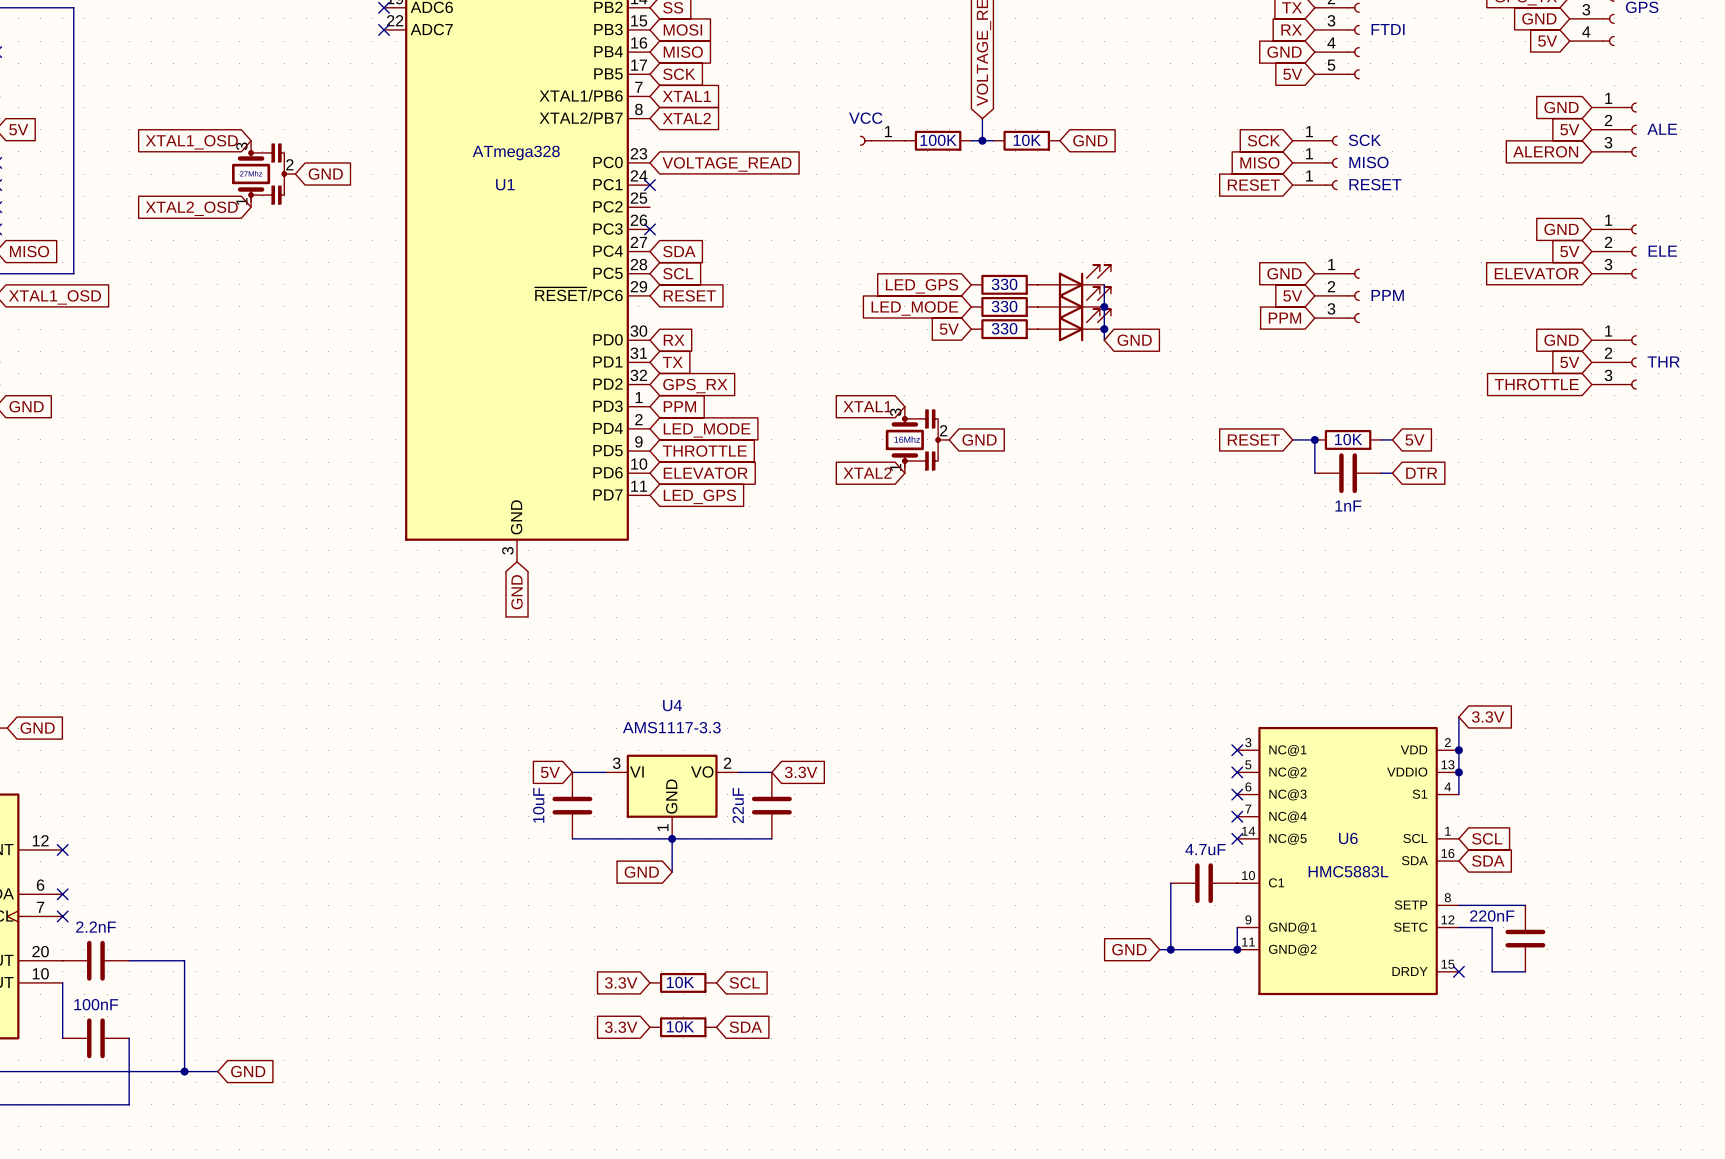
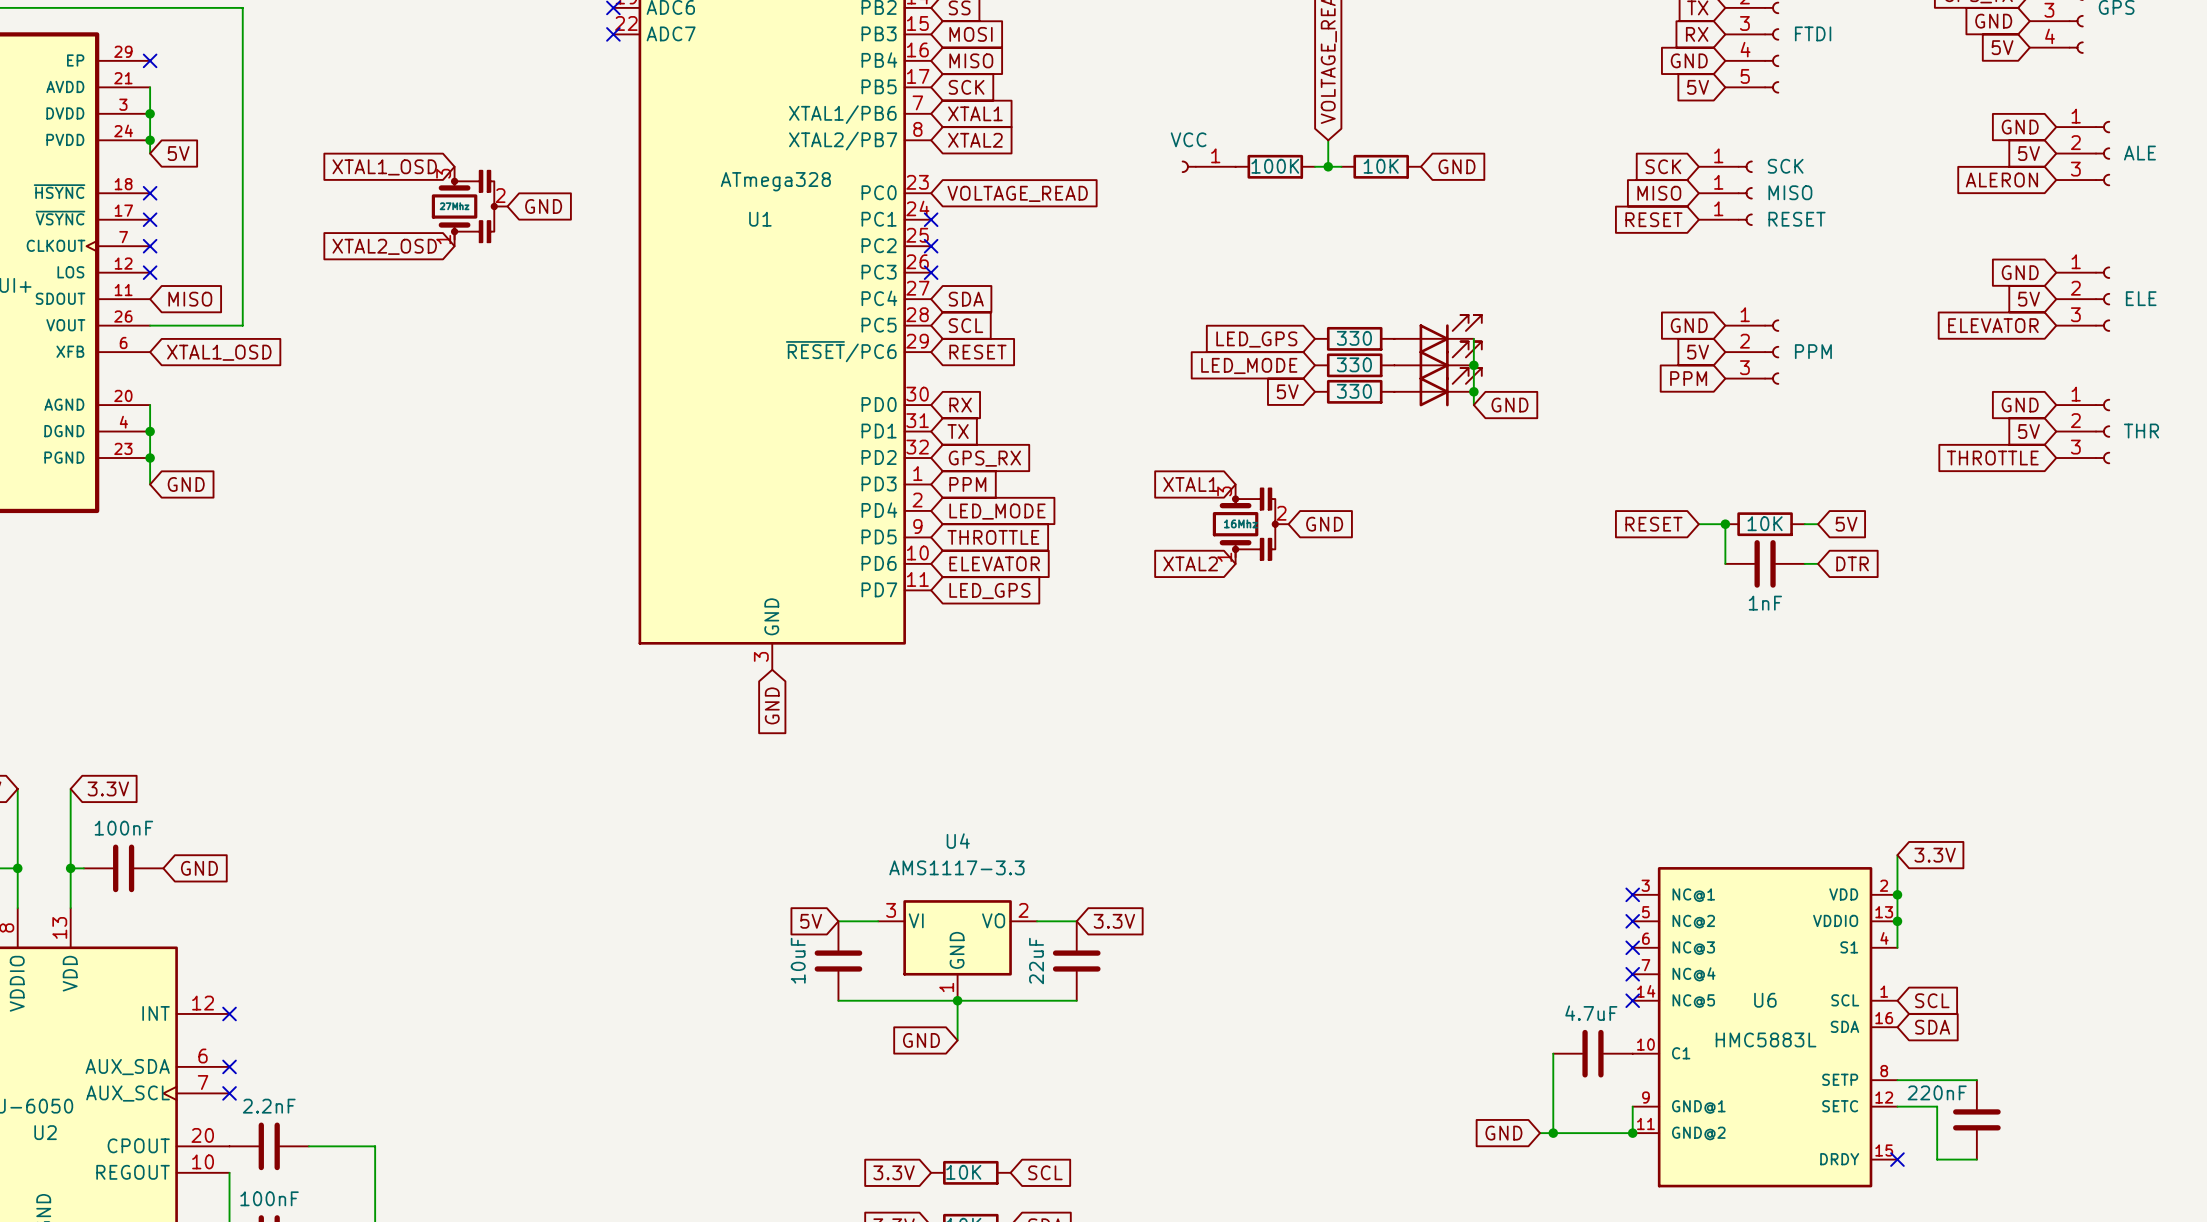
no-connect mark: none -> (931, 246)

